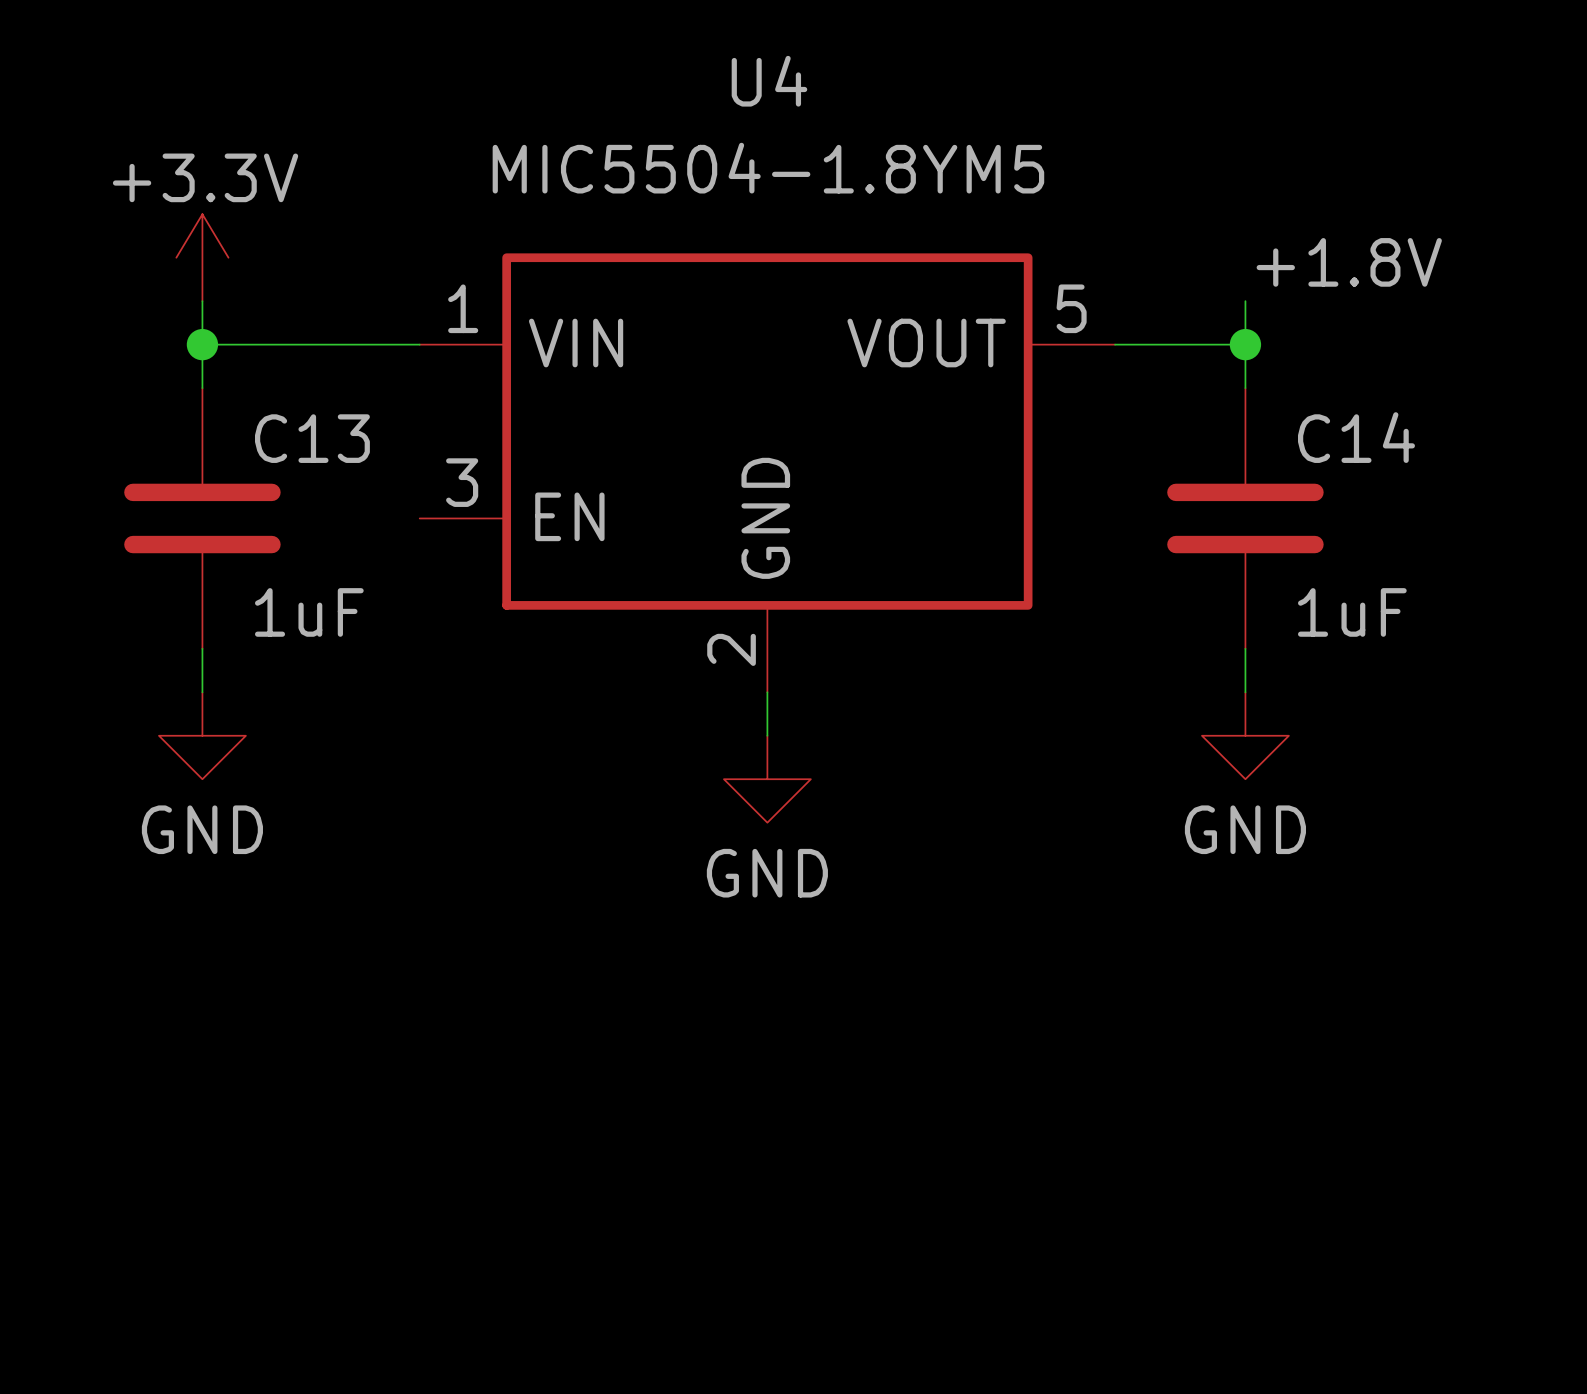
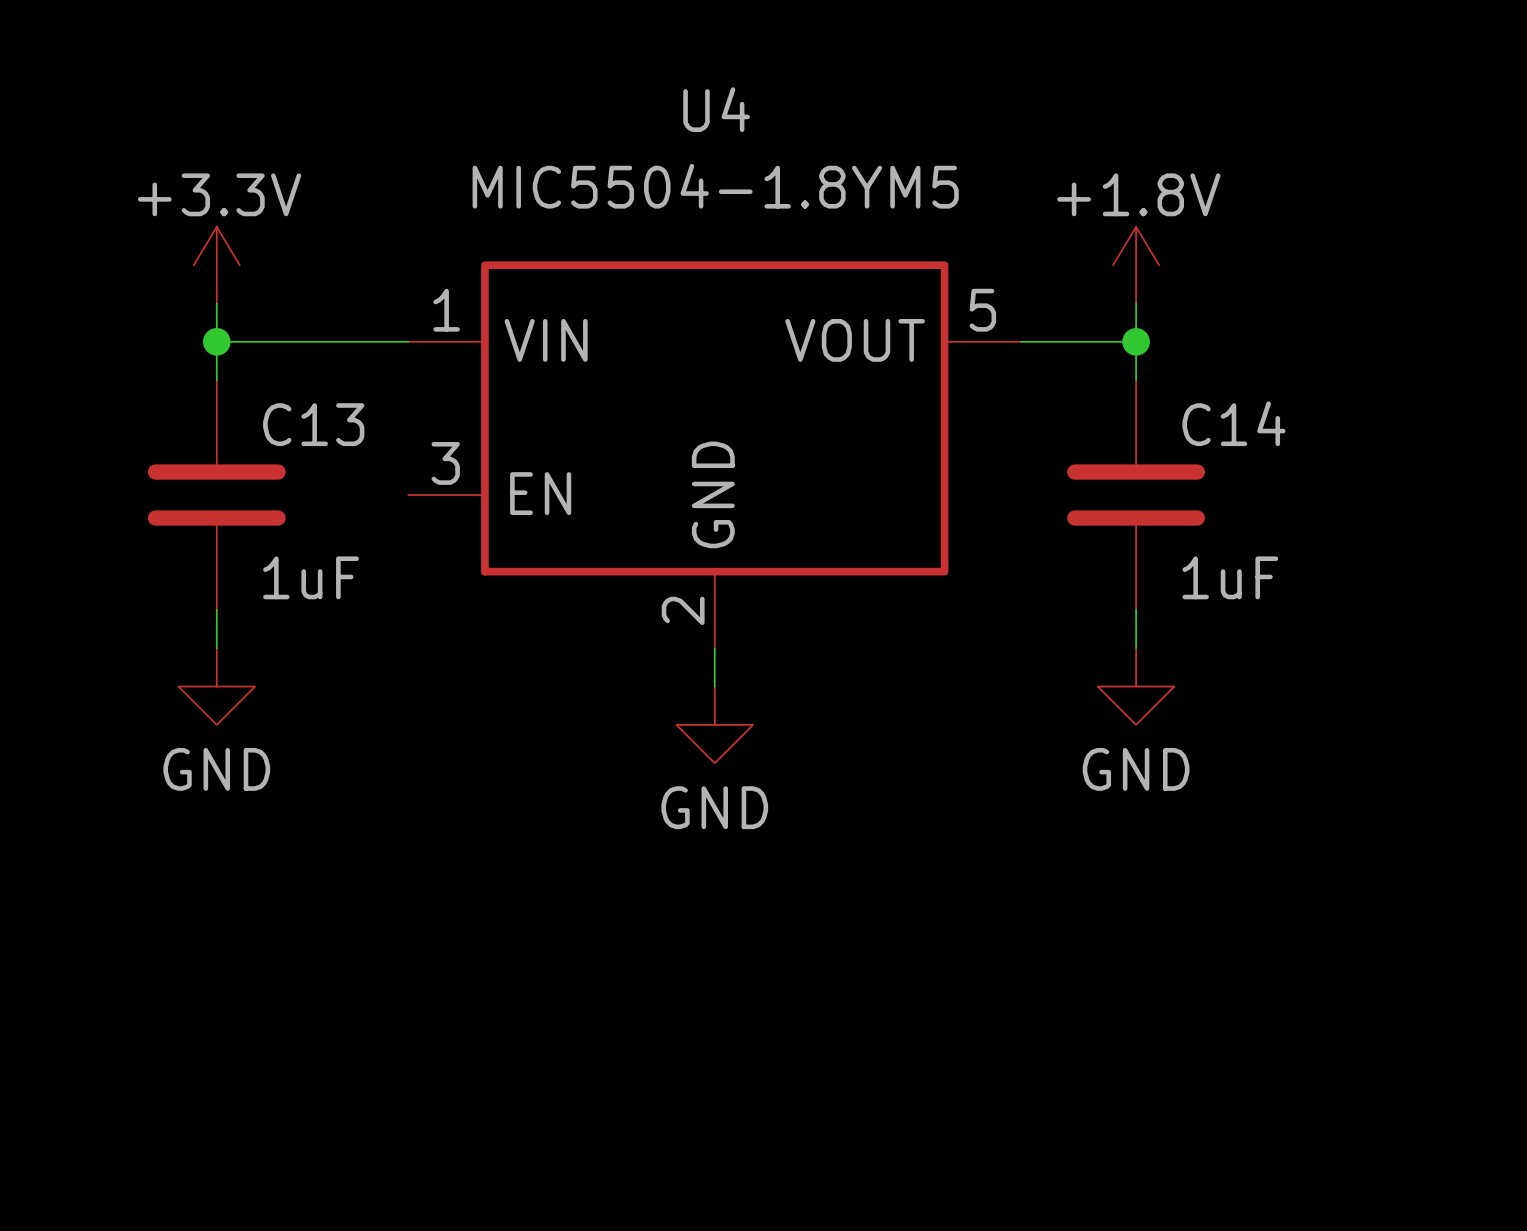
power symbol: none -> +1.8V (1136, 265)
label: +1.8V (1349, 262) -> none

